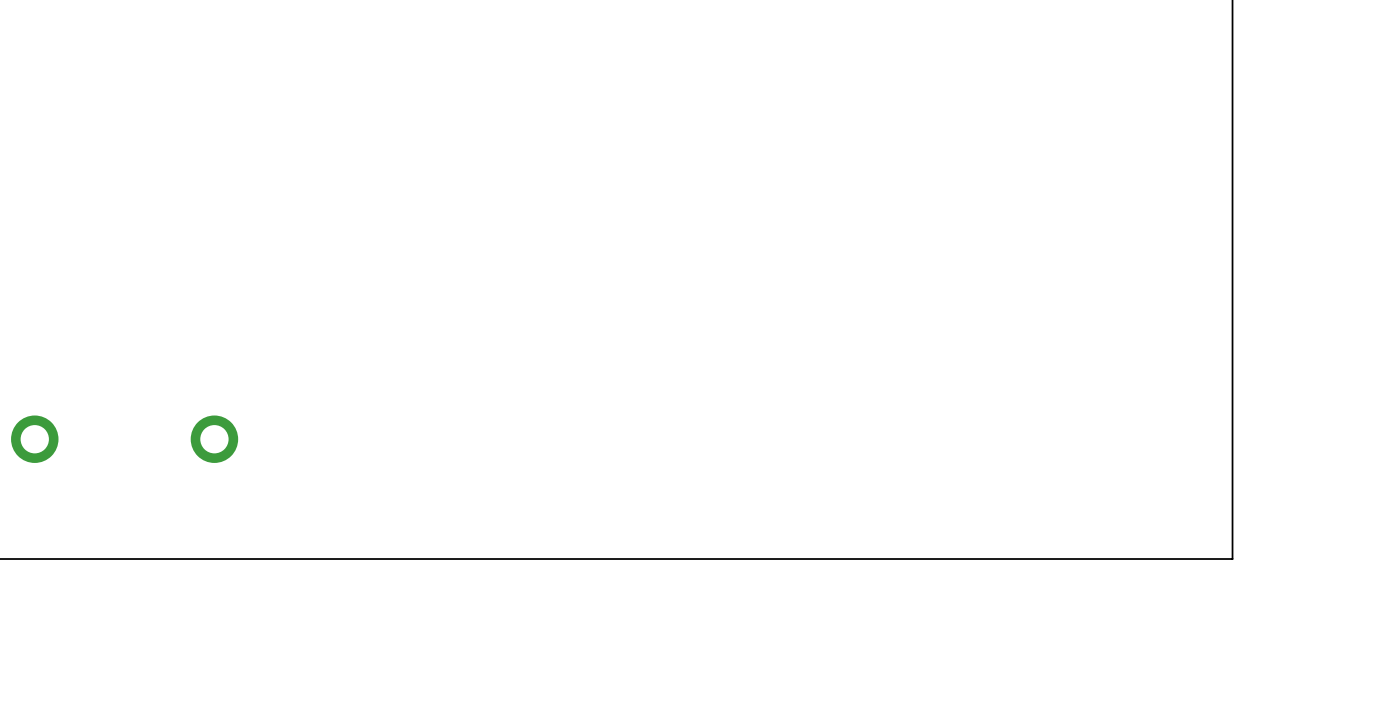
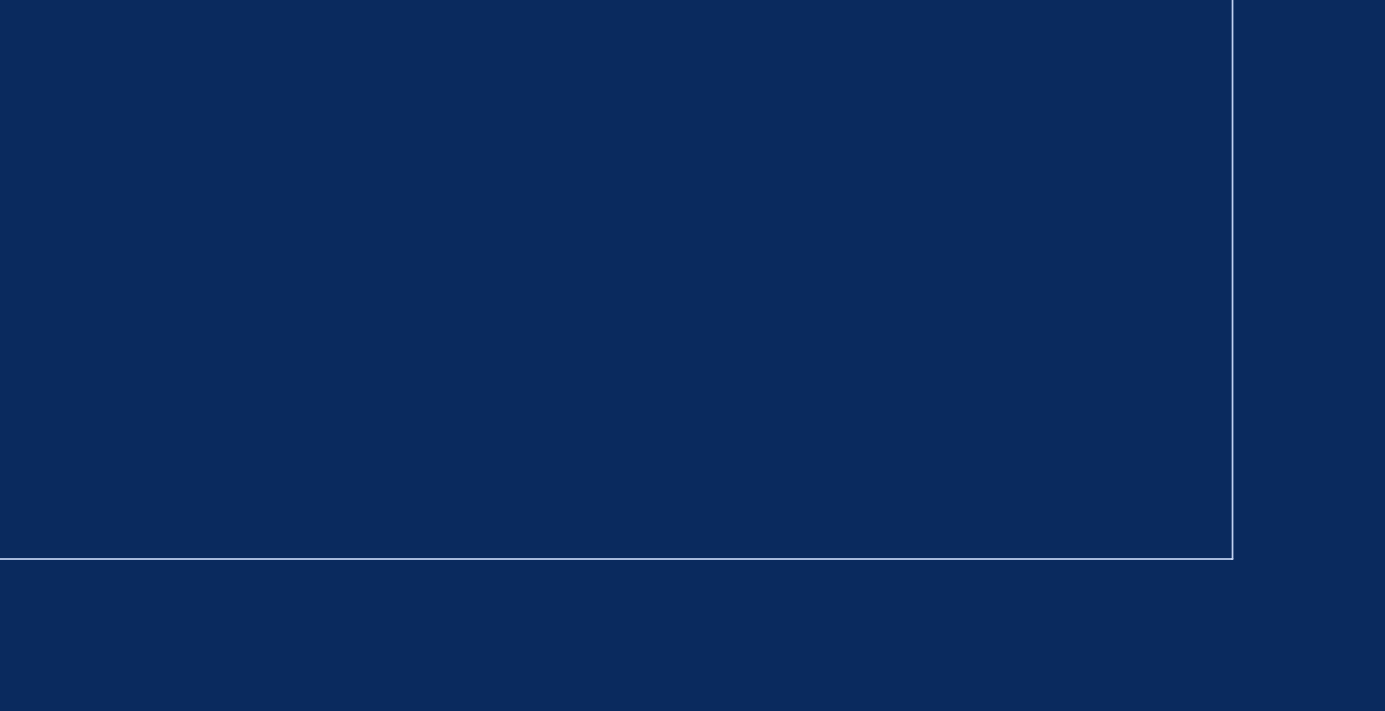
via: (34, 439) -> none
via: (214, 439) -> none

